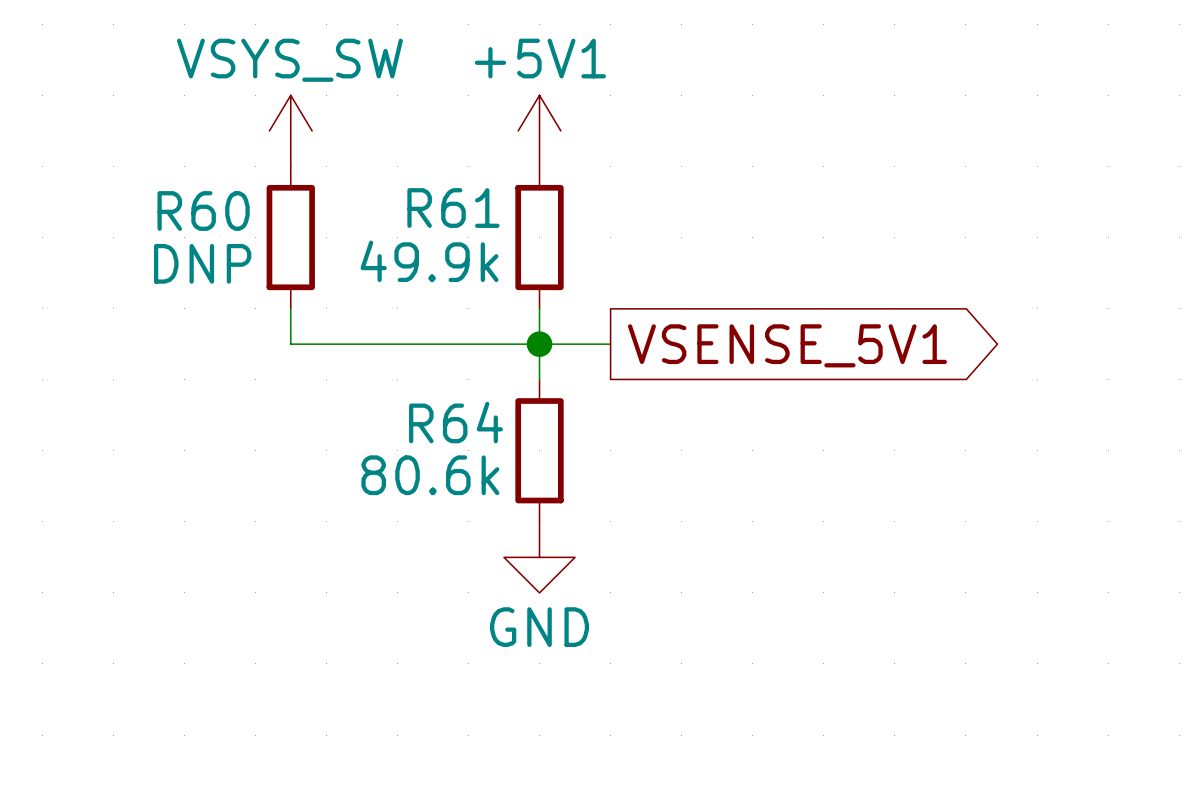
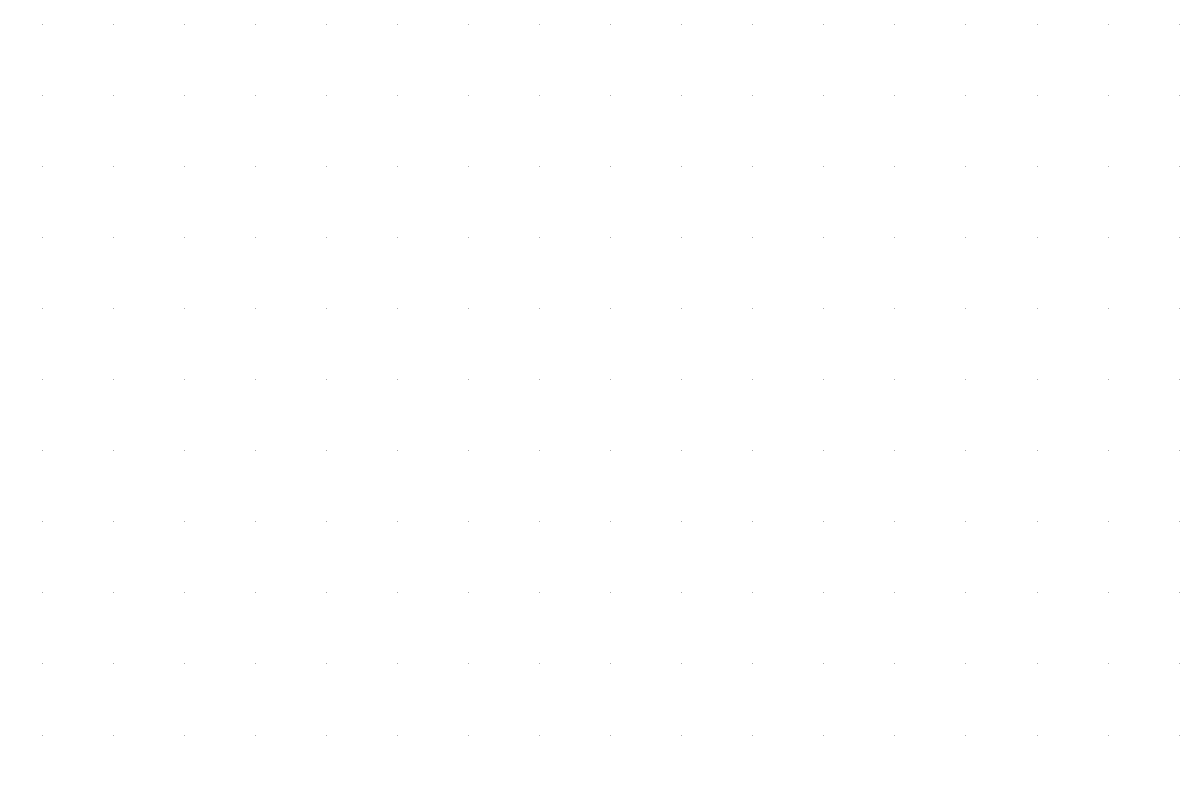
power symbol: VSYS_SW (290, 130) -> none
power symbol: +5V1 (539, 130) -> none
R60: DNP (290, 237) -> none
R61: 49.9k (539, 237) -> none
wire: (290, 308) (290, 344) (610, 344) -> none
wire: (539, 308) (539, 379) -> none
junction: (539, 344) -> none
global label: VSENSE_5V1 (787, 345) -> none
R64: 80.6k (539, 450) -> none
power symbol: GND (539, 557) -> none

